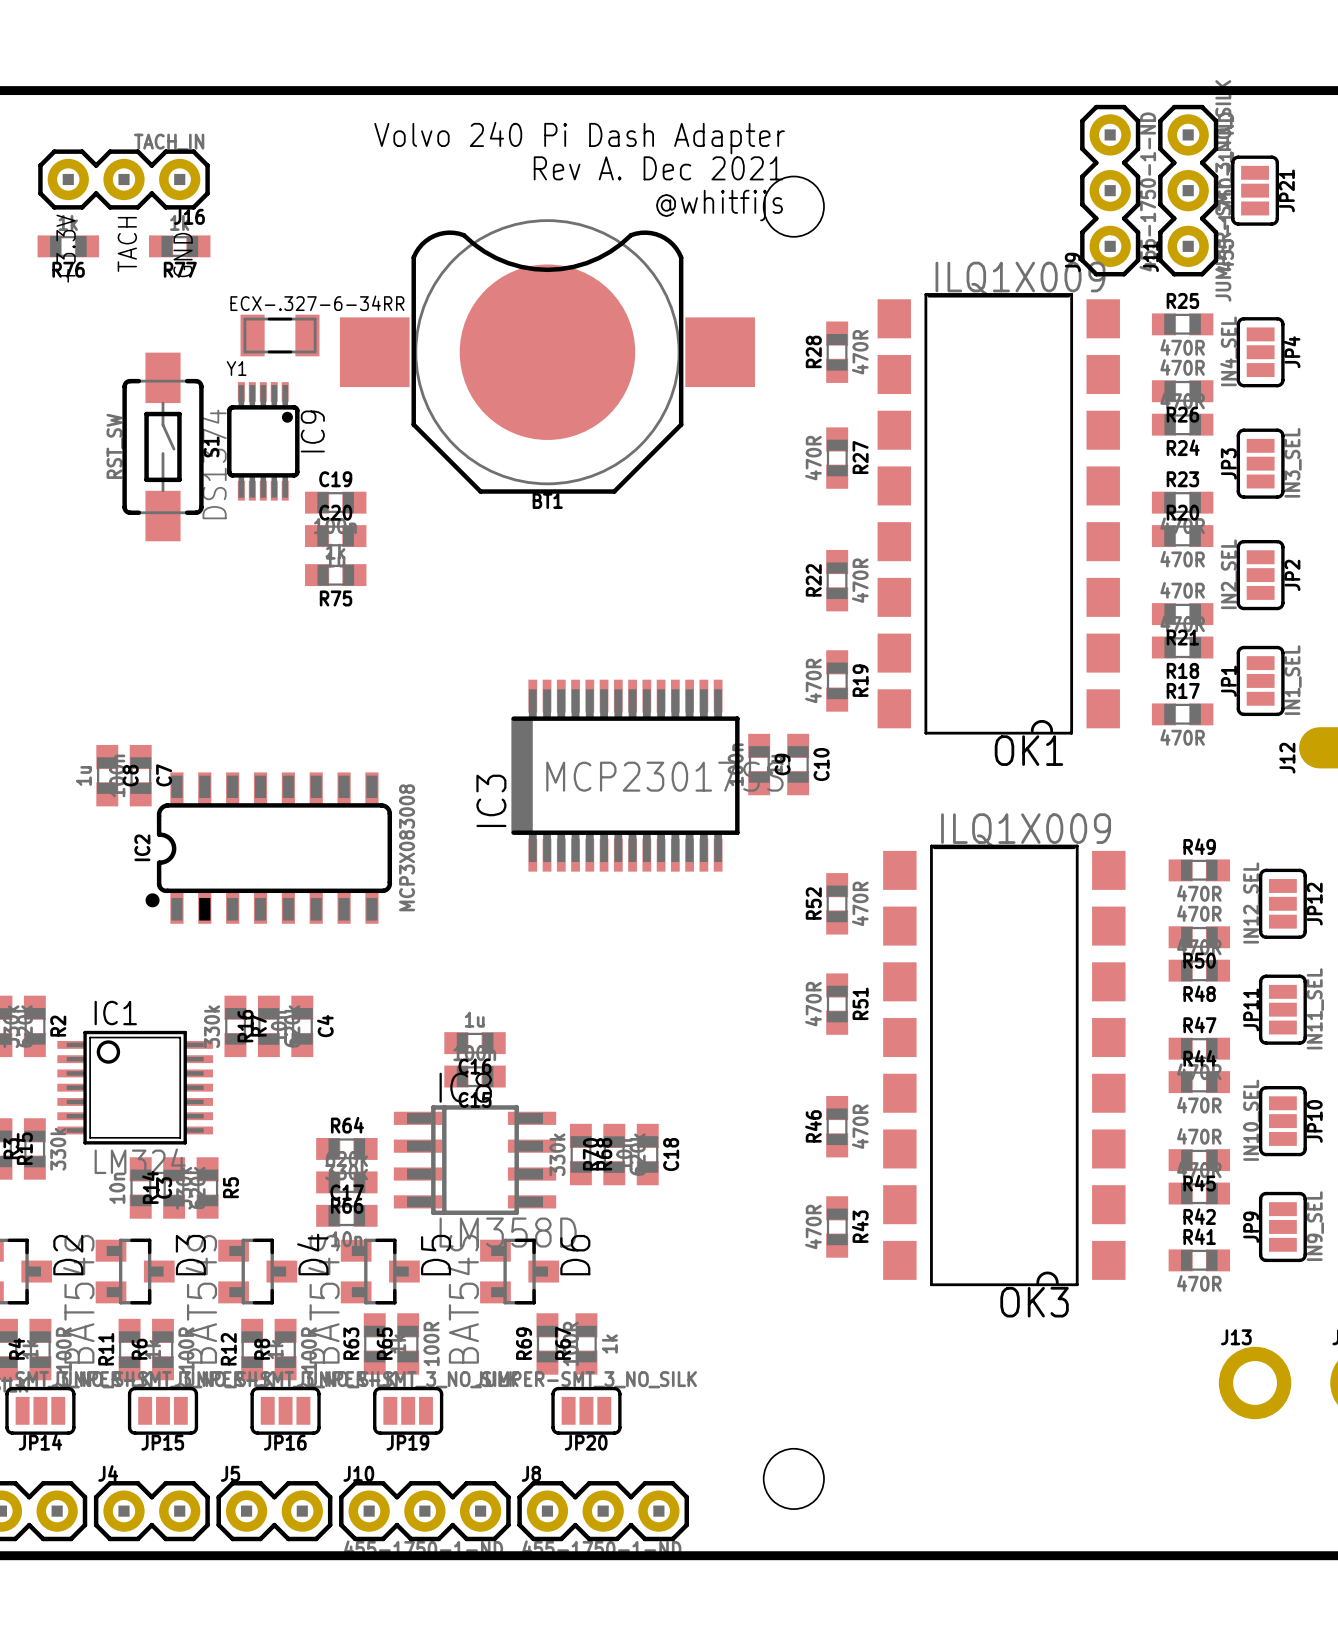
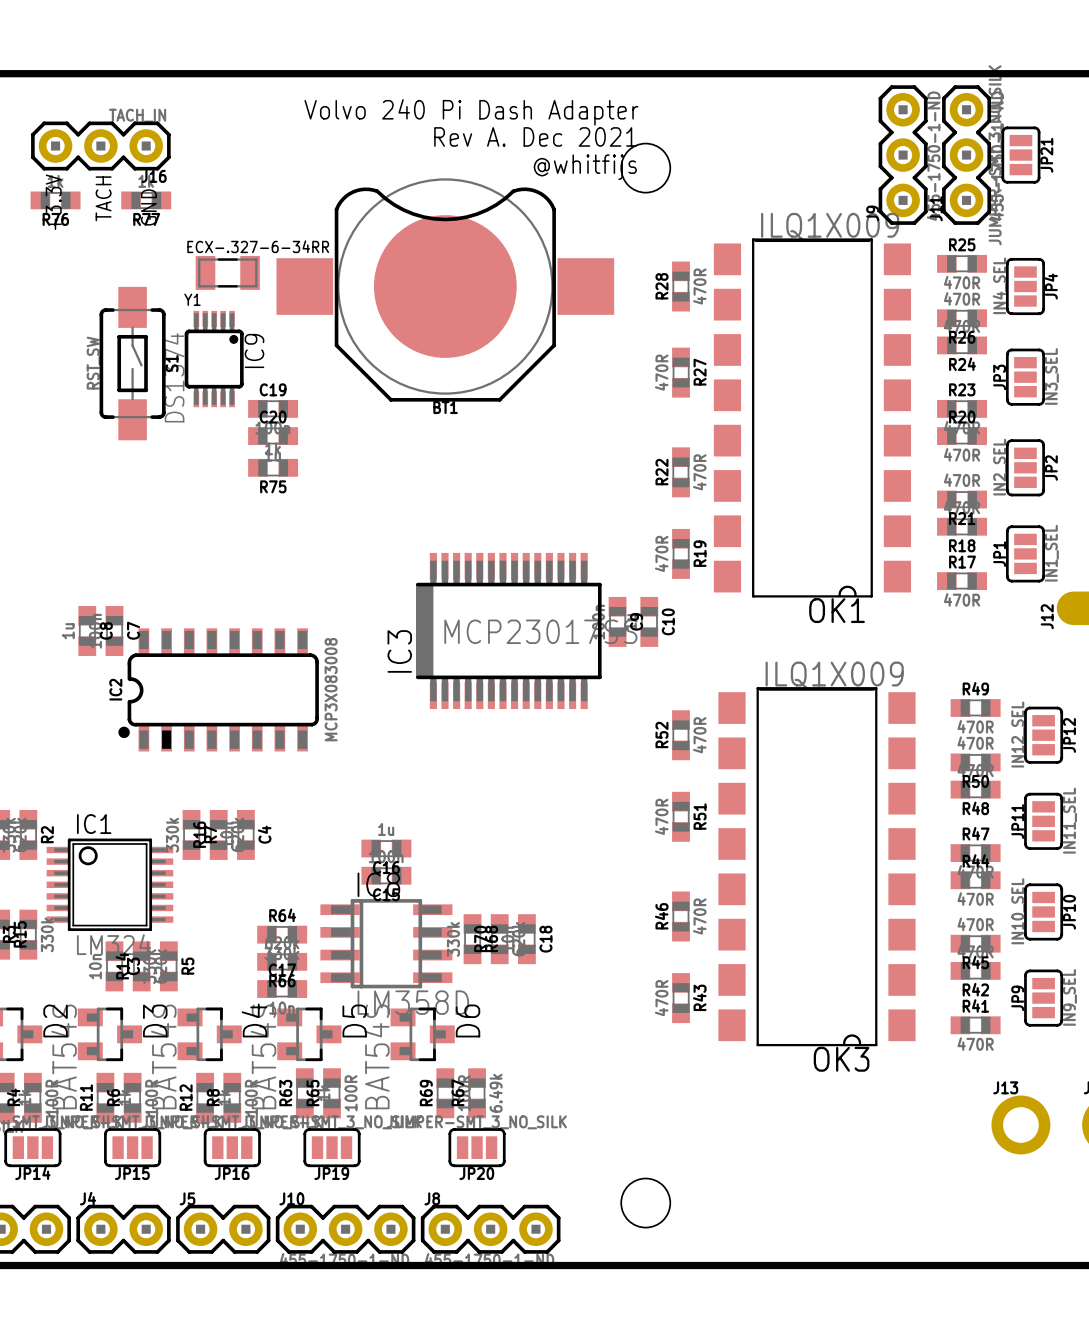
R67 value: 1k (609, 1343) -> 6.49k (495, 1093)

